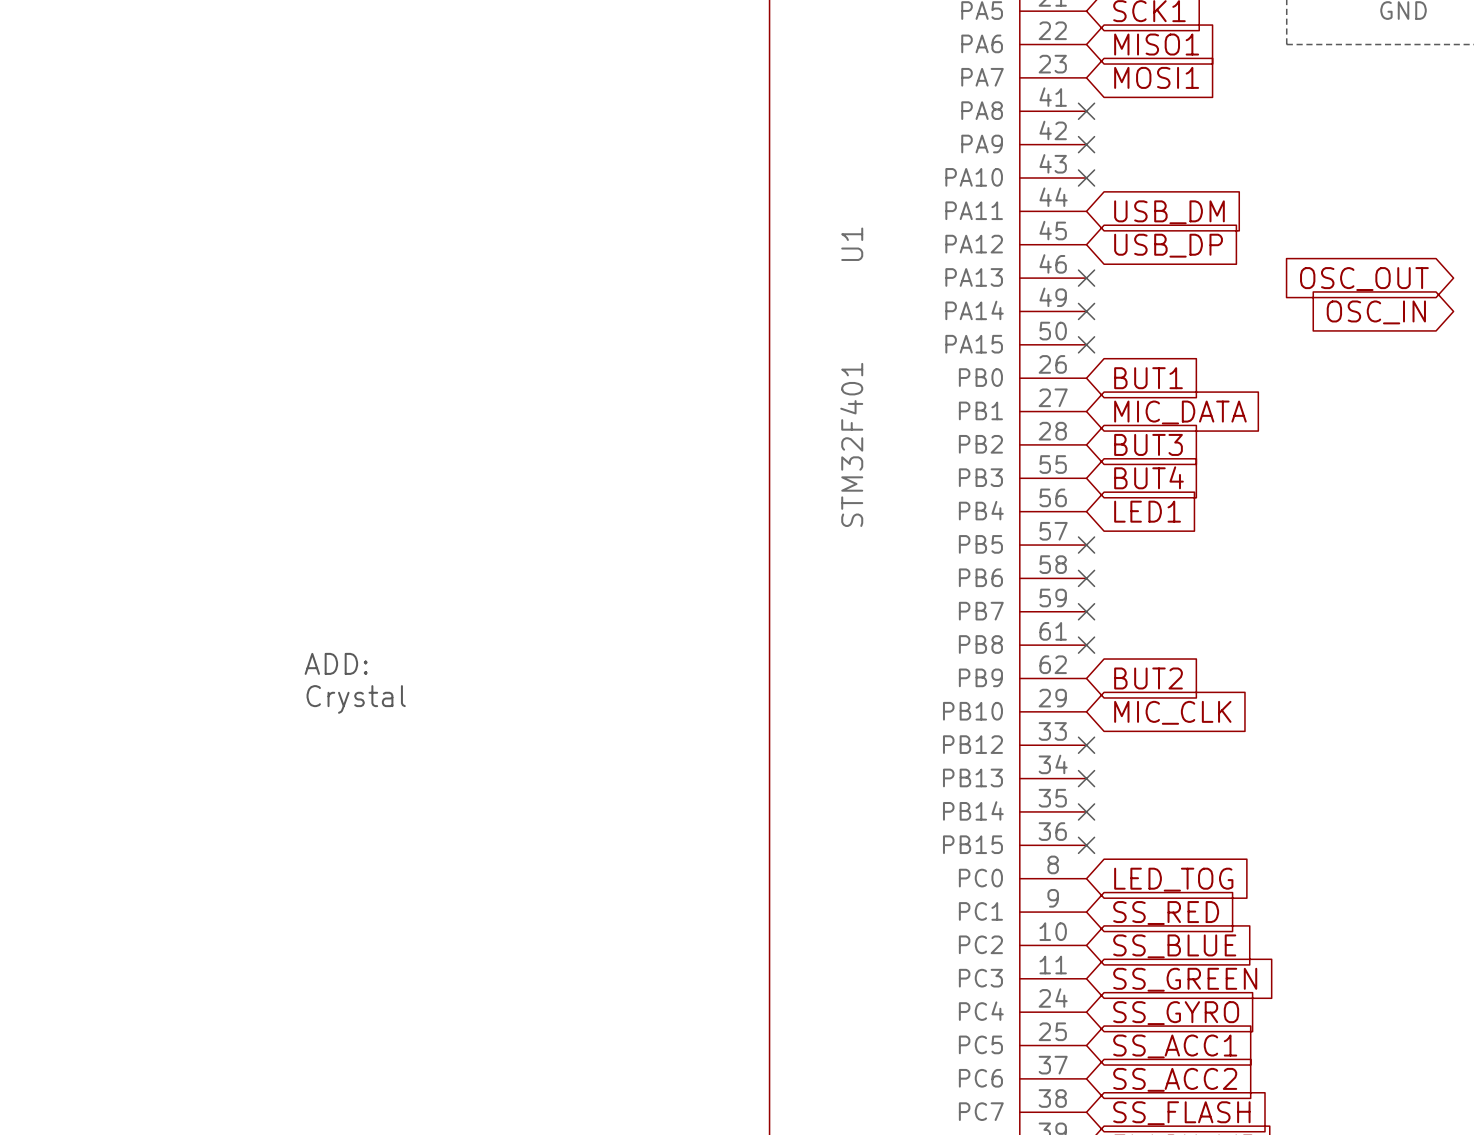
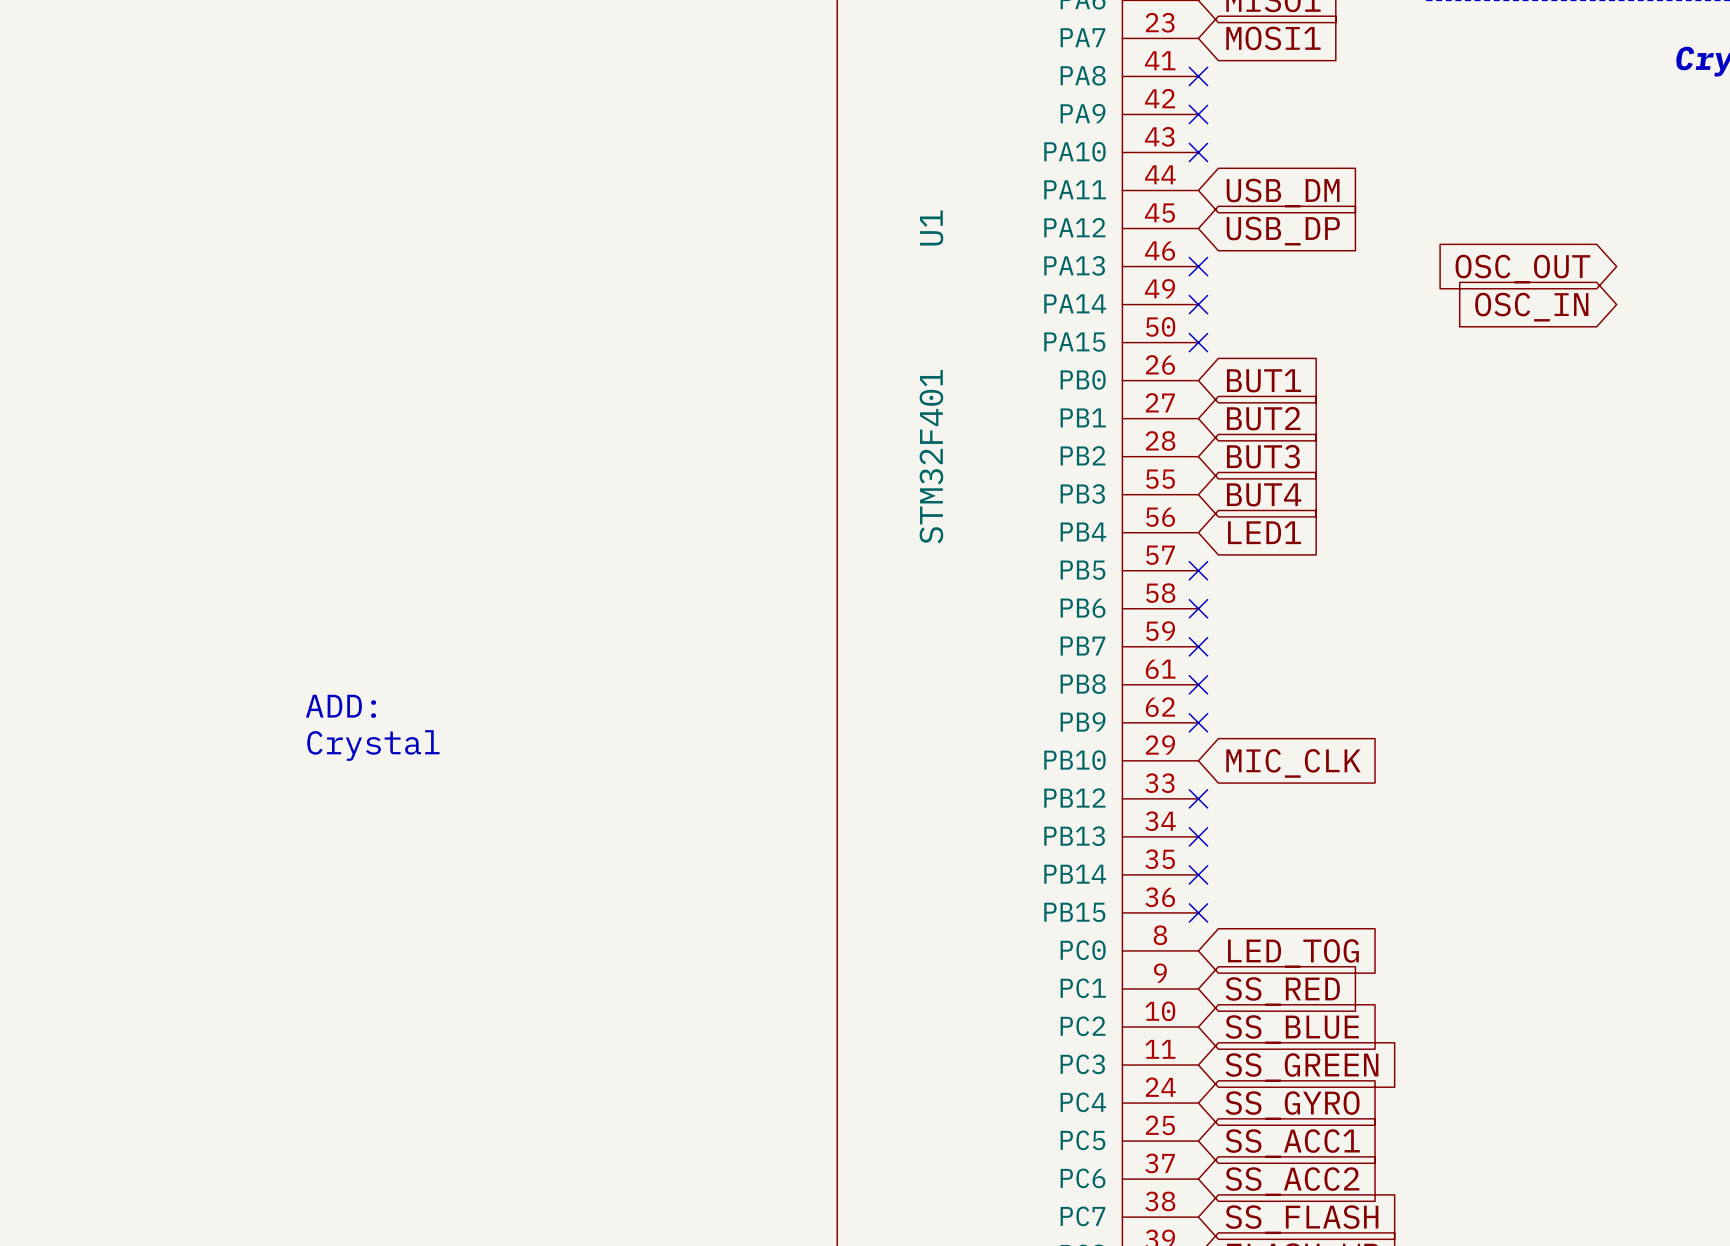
global label: MIC_DATA (1180, 412) -> BUT2 (1263, 418)
no-connect mark: none -> (1198, 722)
global label: BUT2 (1148, 678) -> none

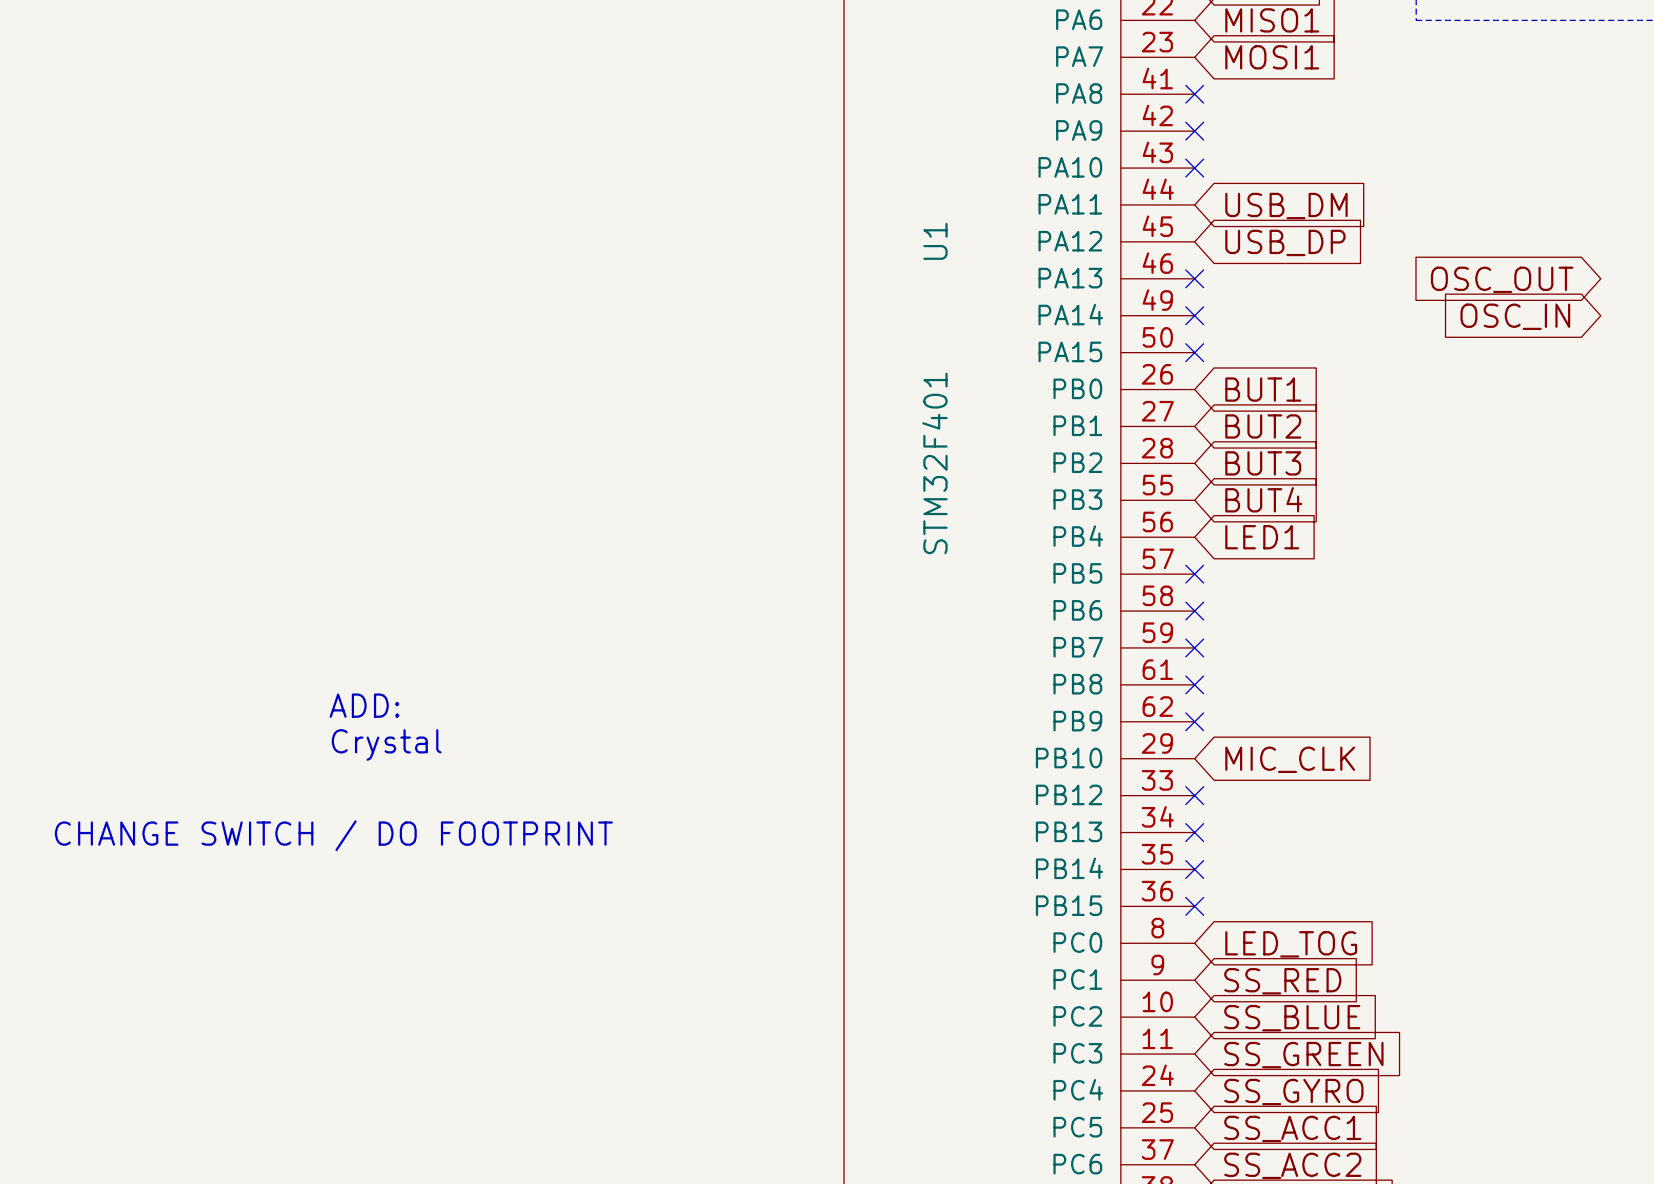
text: none -> CHANGE SWITCH / DO FOOTPRINT (333, 835)

